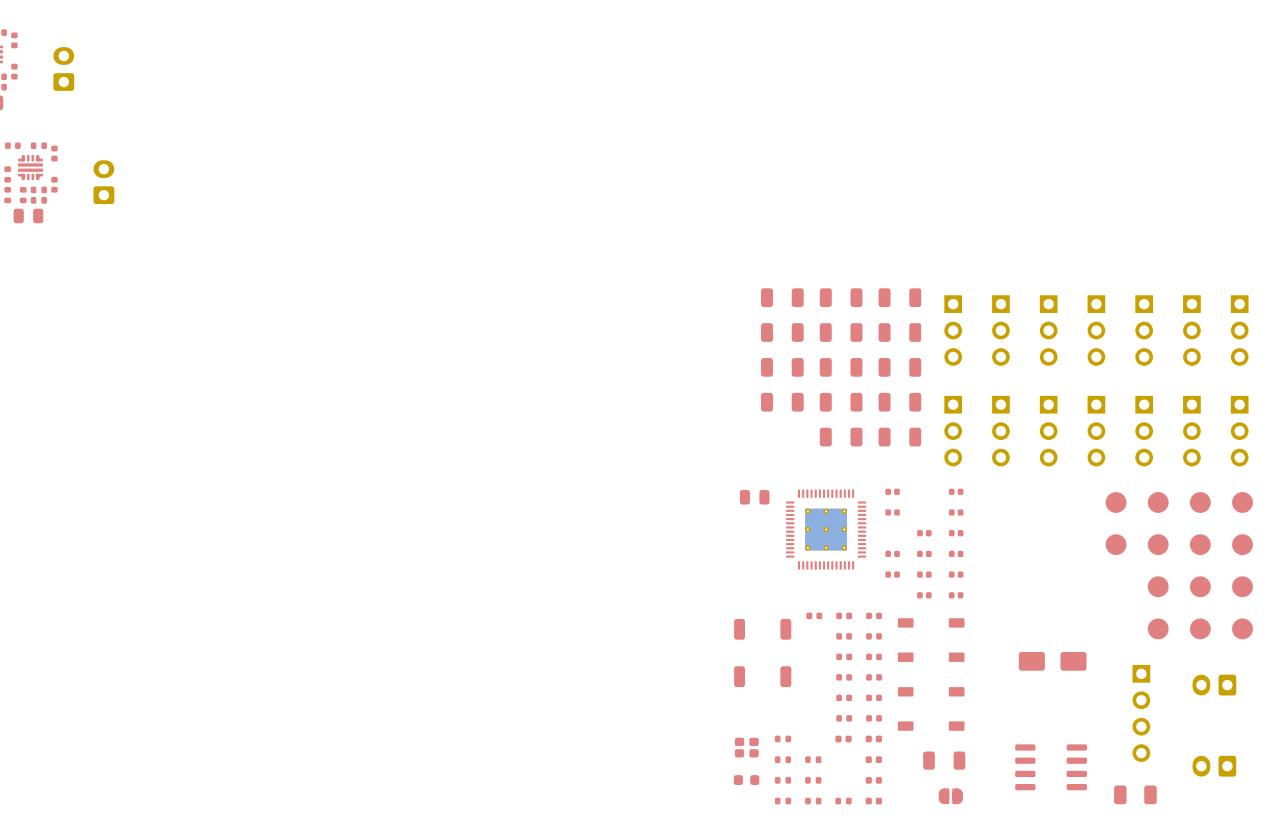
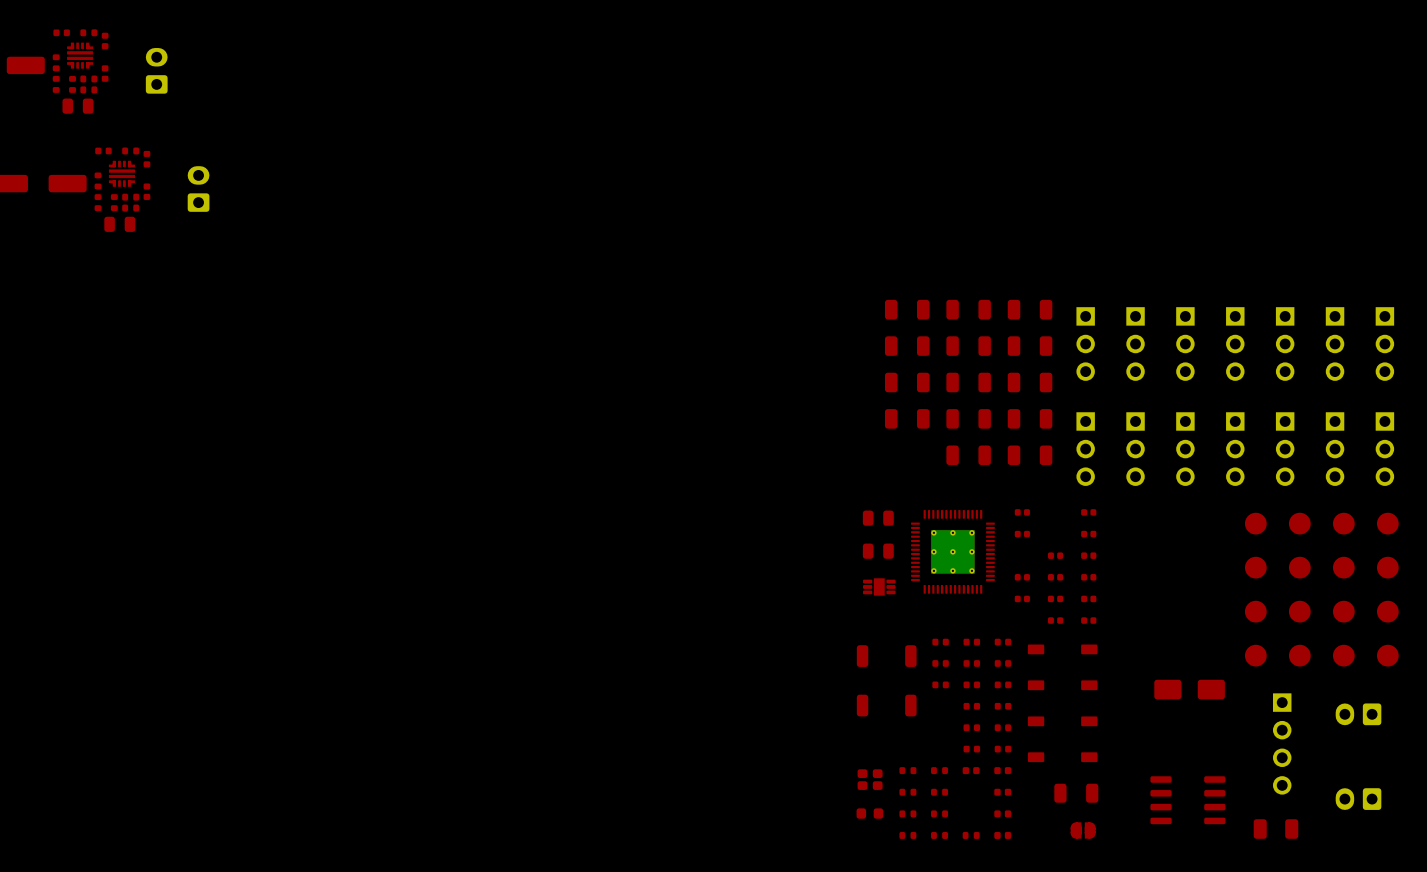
part: none -> (878, 551)
part: none -> (879, 586)
part: none -> (1255, 611)
part: none -> (1255, 655)
part: none -> (940, 663)
part: none -> (940, 684)
part: none -> (939, 770)

